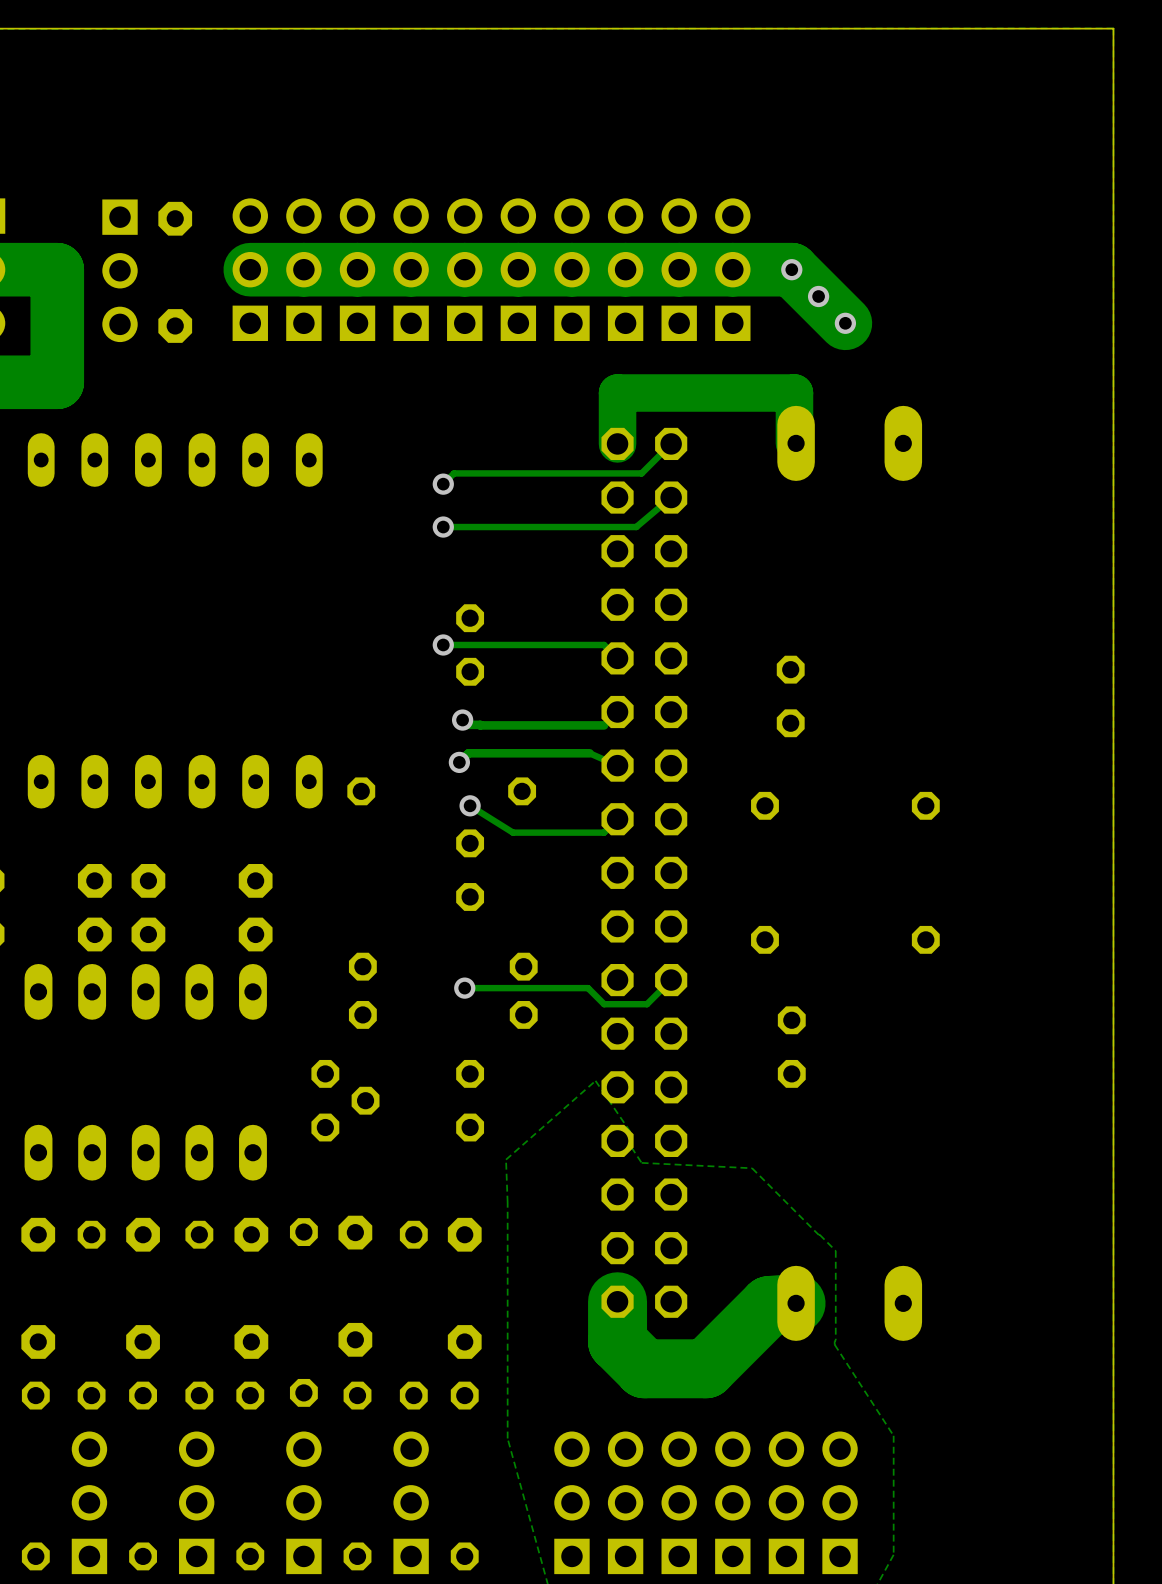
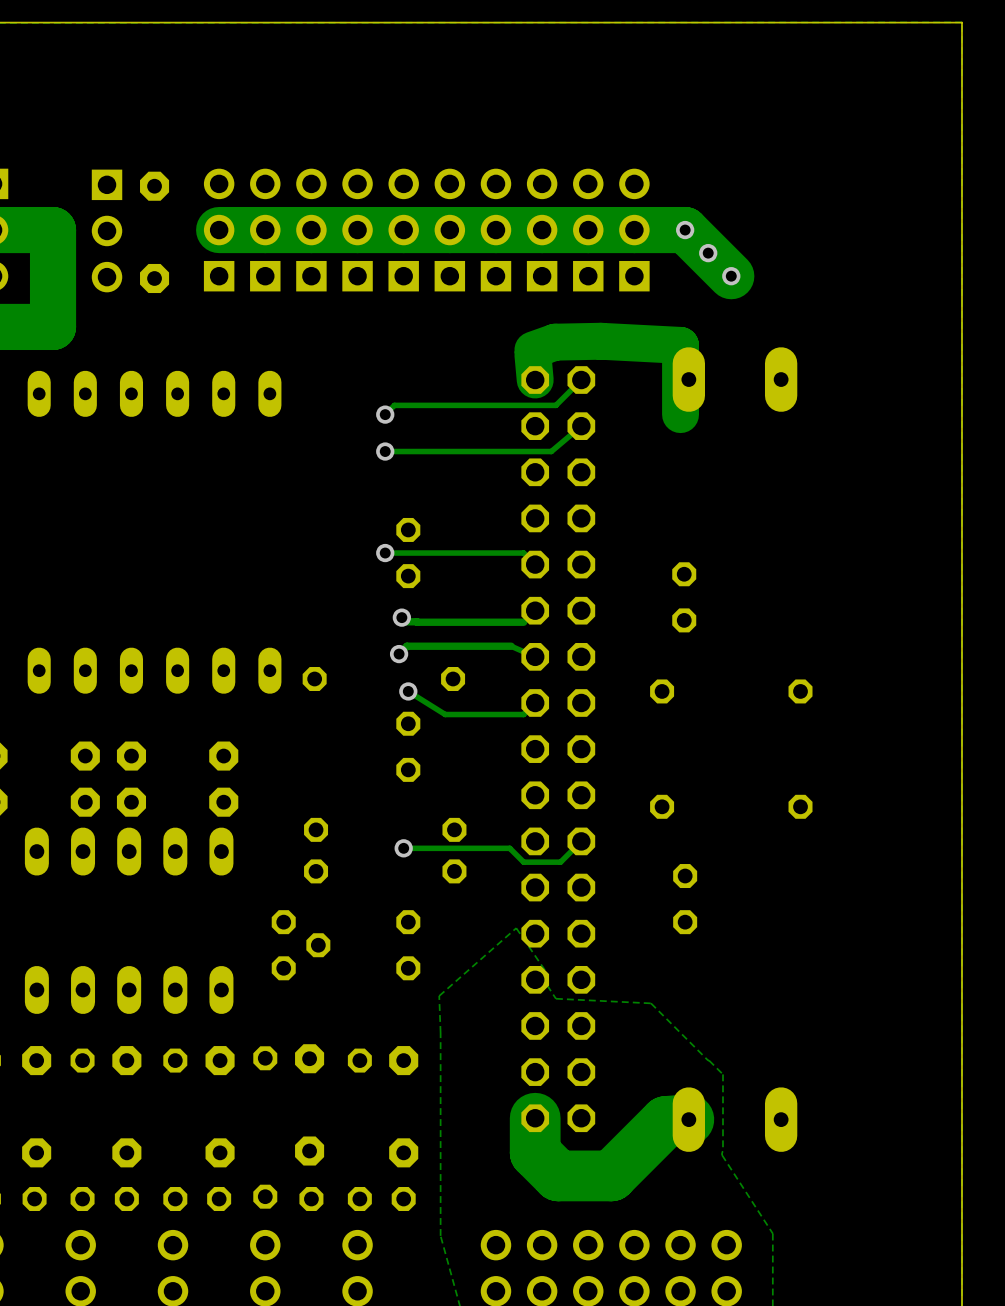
track: (796, 443) (794, 443) (794, 393) (617, 393) (617, 443) -> (688, 379) (680, 414) (680, 345) (600, 341) (555, 342) (532, 350) (535, 380)

